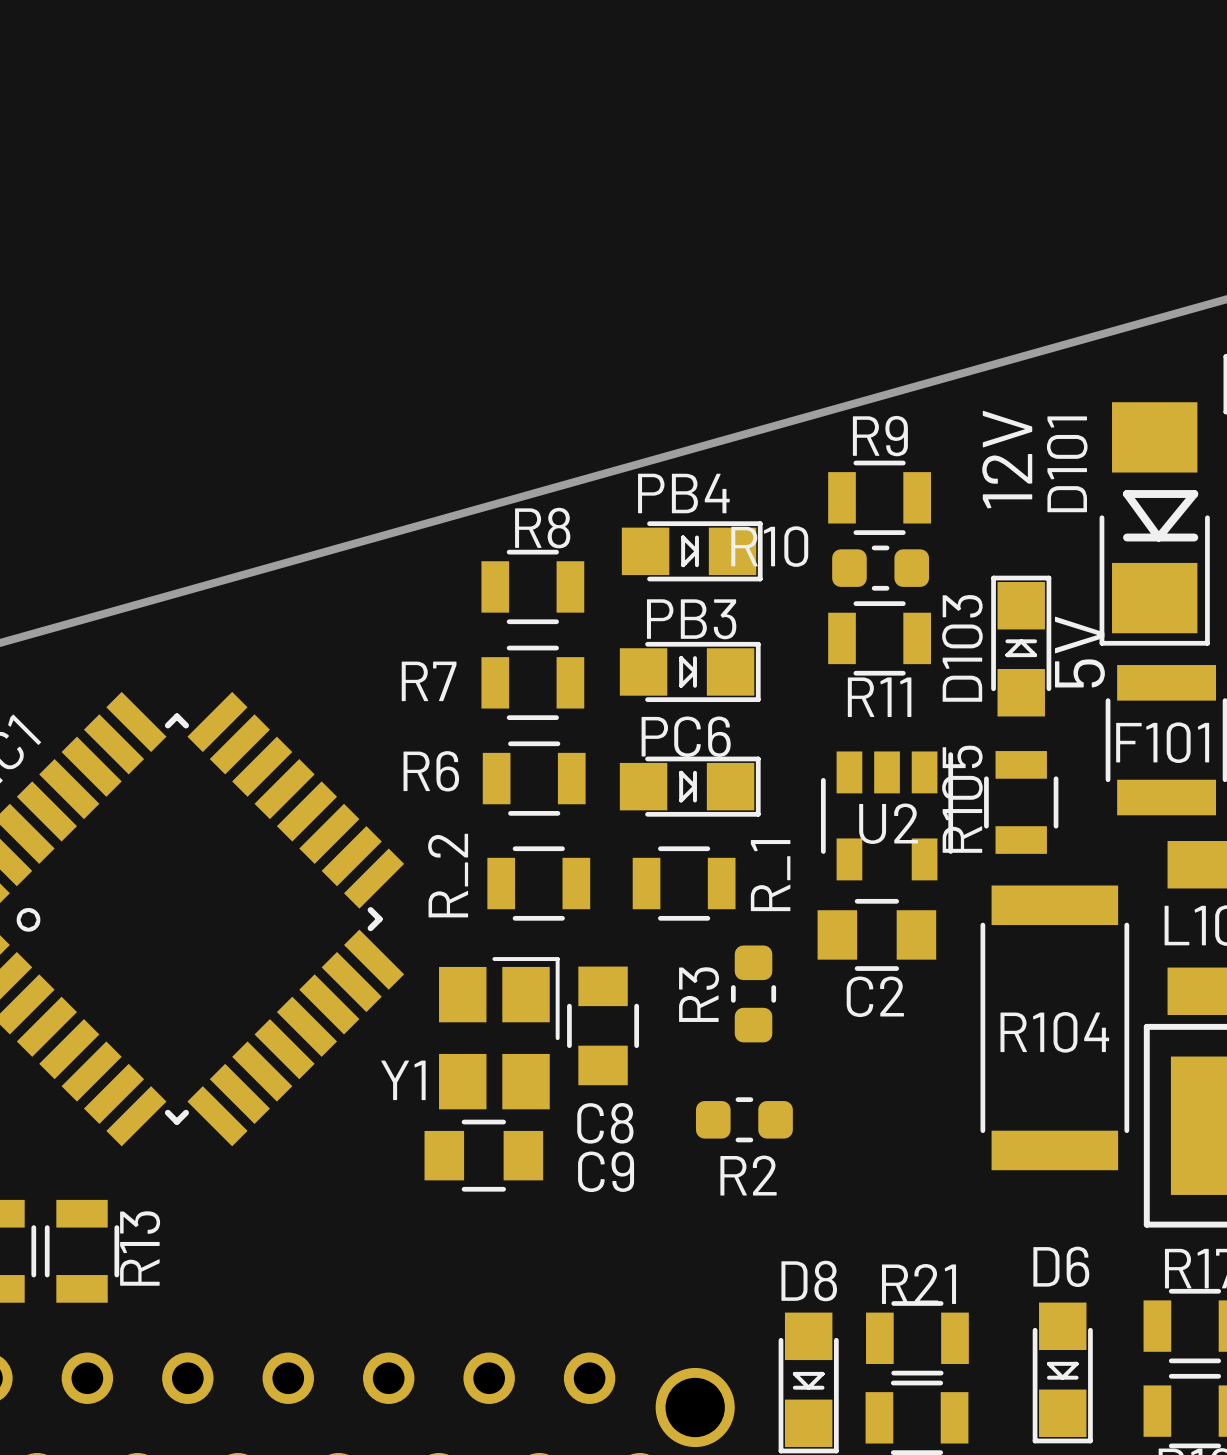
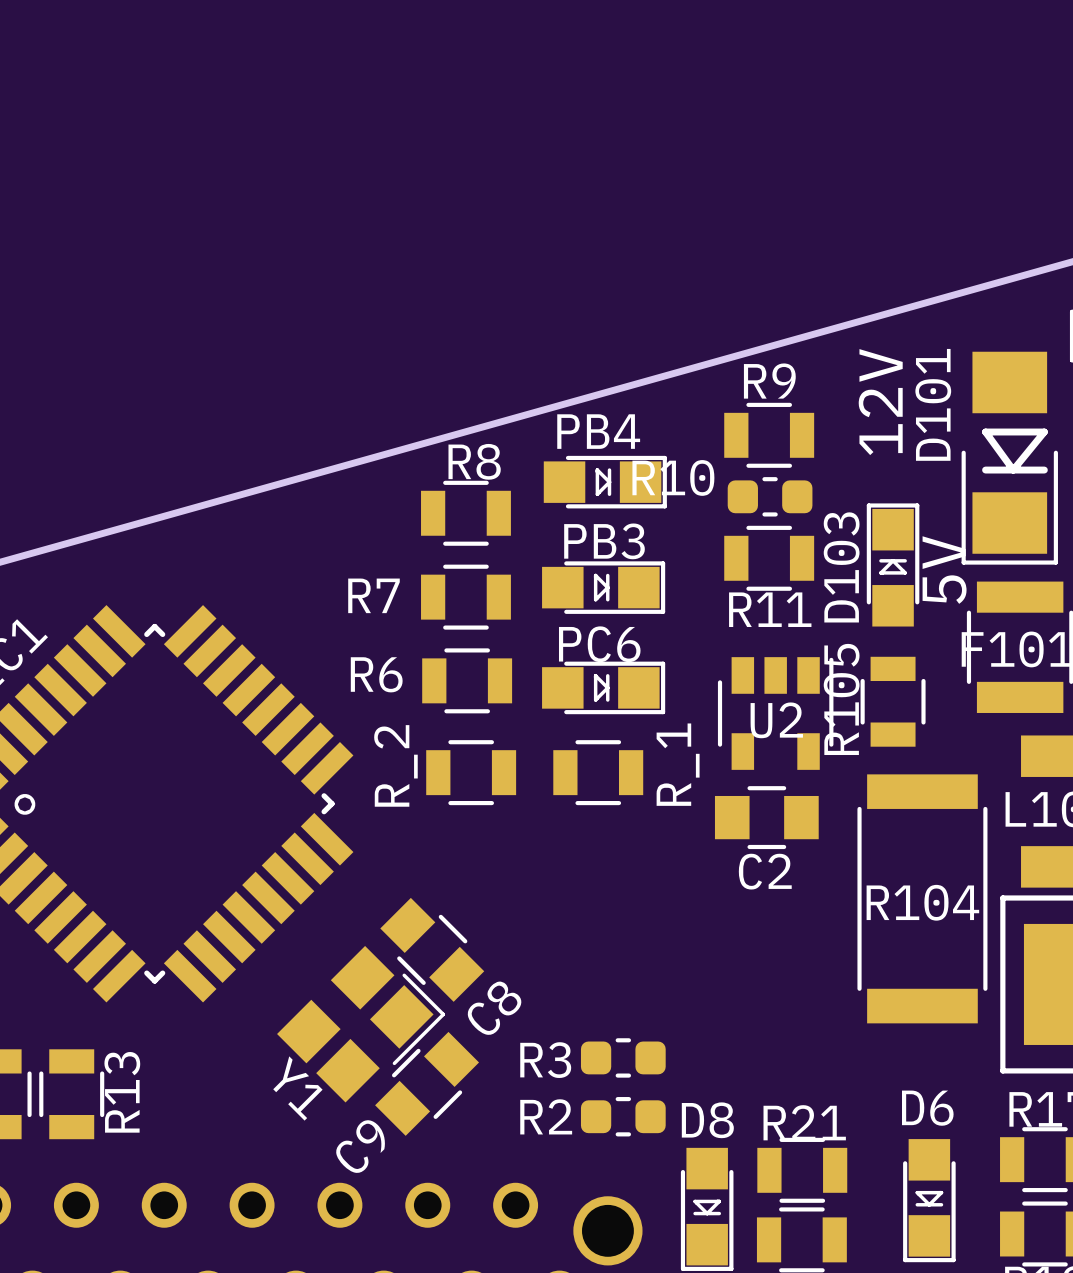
R3 rotation: 0° (753, 993) -> 90° clockwise (623, 1057)
R3 position: (753, 993) -> (623, 1057)
C8 rotation: 0° (603, 1025) -> 45° counterclockwise (432, 949)
C8 position: (603, 1025) -> (432, 949)
Y1 rotation: 0° (499, 1033) -> 45° clockwise (361, 1024)
Y1 position: (499, 1033) -> (361, 1024)
R2 position: (744, 1119) -> (623, 1116)
C9 rotation: 0° (483, 1155) -> 45° counterclockwise (427, 1083)
C9 position: (483, 1155) -> (427, 1083)
C9 name position: C9 (606, 1171) -> C9 (360, 1146)
R2 name position: R2 (748, 1175) -> R2 (546, 1116)

